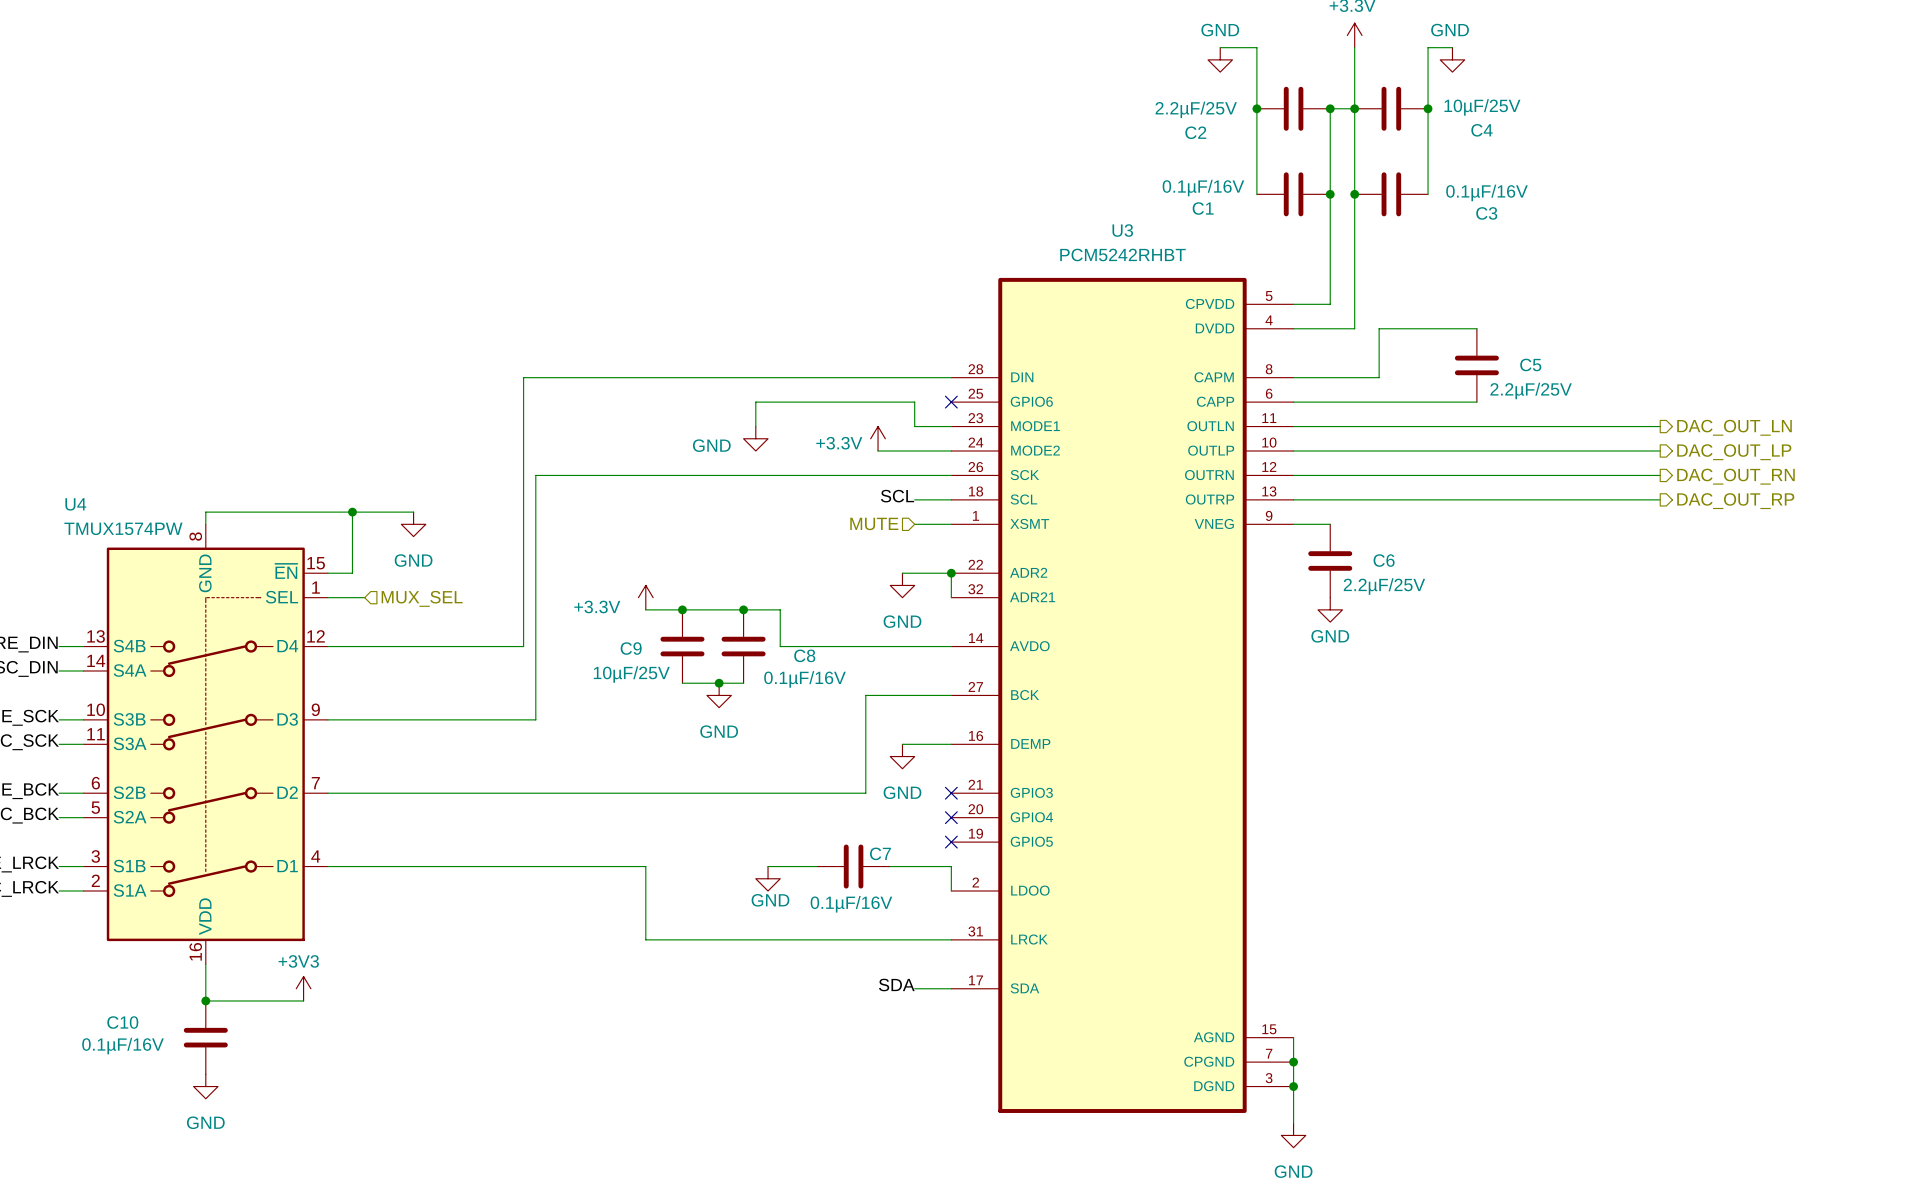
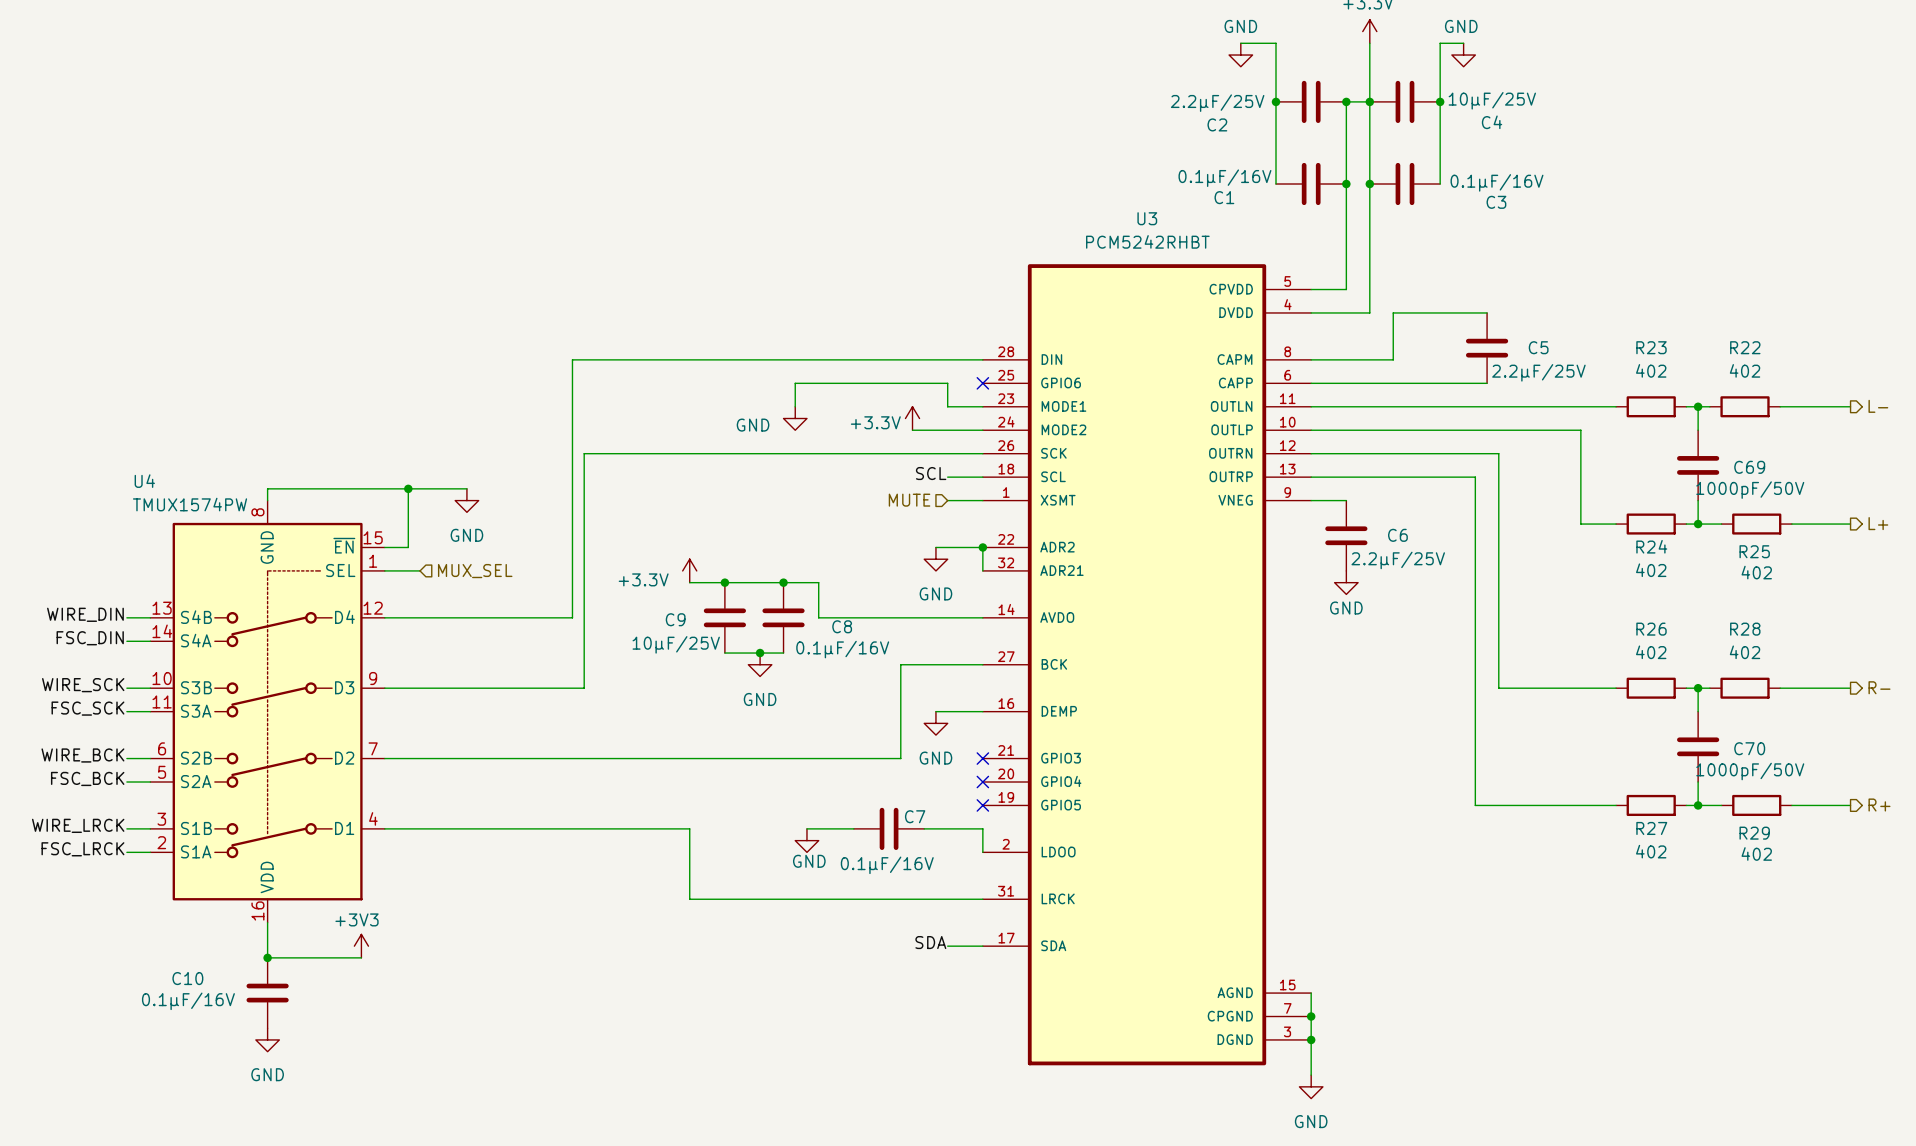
wire: (1611, 426) (1660, 426) -> none
R23: none -> 402 (1651, 406)
wire: none -> (1686, 406) (1709, 406)
wire: none -> (1698, 406) (1698, 430)
junction: none -> (1698, 406)
R22: none -> 402 (1745, 406)
wire: none -> (1780, 406) (1850, 406)
hierarchical label: none -> L- (1878, 406)
hierarchical label: DAC_OUT_LN (1734, 427) -> none
wire: (1574, 450) (1660, 450) -> (1580, 430) (1580, 524) (1616, 524)
hierarchical label: DAC_OUT_LP (1734, 452) -> none
wire: (1489, 475) (1660, 475) -> (1498, 453) (1498, 688) (1616, 688)
hierarchical label: DAC_OUT_RN (1735, 476) -> none
C69: none -> 1000pF/50V (1698, 465)
wire: (1464, 499) (1660, 499) -> (1475, 477) (1475, 805) (1616, 805)
hierarchical label: DAC_OUT_RP (1735, 501) -> none
wire: none -> (1698, 500) (1698, 524)
R24: none -> 402 (1651, 524)
wire: none -> (1686, 524) (1721, 524)
junction: none -> (1698, 524)
R25: none -> 402 (1756, 524)
wire: none -> (1791, 524) (1850, 524)
hierarchical label: none -> L+ (1878, 523)
R26: none -> 402 (1651, 688)
wire: none -> (1686, 688) (1709, 688)
wire: none -> (1698, 688) (1698, 711)
junction: none -> (1698, 688)
R28: none -> 402 (1745, 688)
wire: none -> (1780, 688) (1850, 688)
hierarchical label: none -> R- (1879, 687)
C70: none -> 1000pF/50V (1698, 746)
wire: none -> (1698, 782) (1698, 805)
hierarchical label: none -> R+ (1879, 805)
R27: none -> 402 (1651, 805)
wire: none -> (1686, 805) (1721, 805)
junction: none -> (1698, 805)
R29: none -> 402 (1756, 805)
wire: none -> (1791, 805) (1850, 805)

